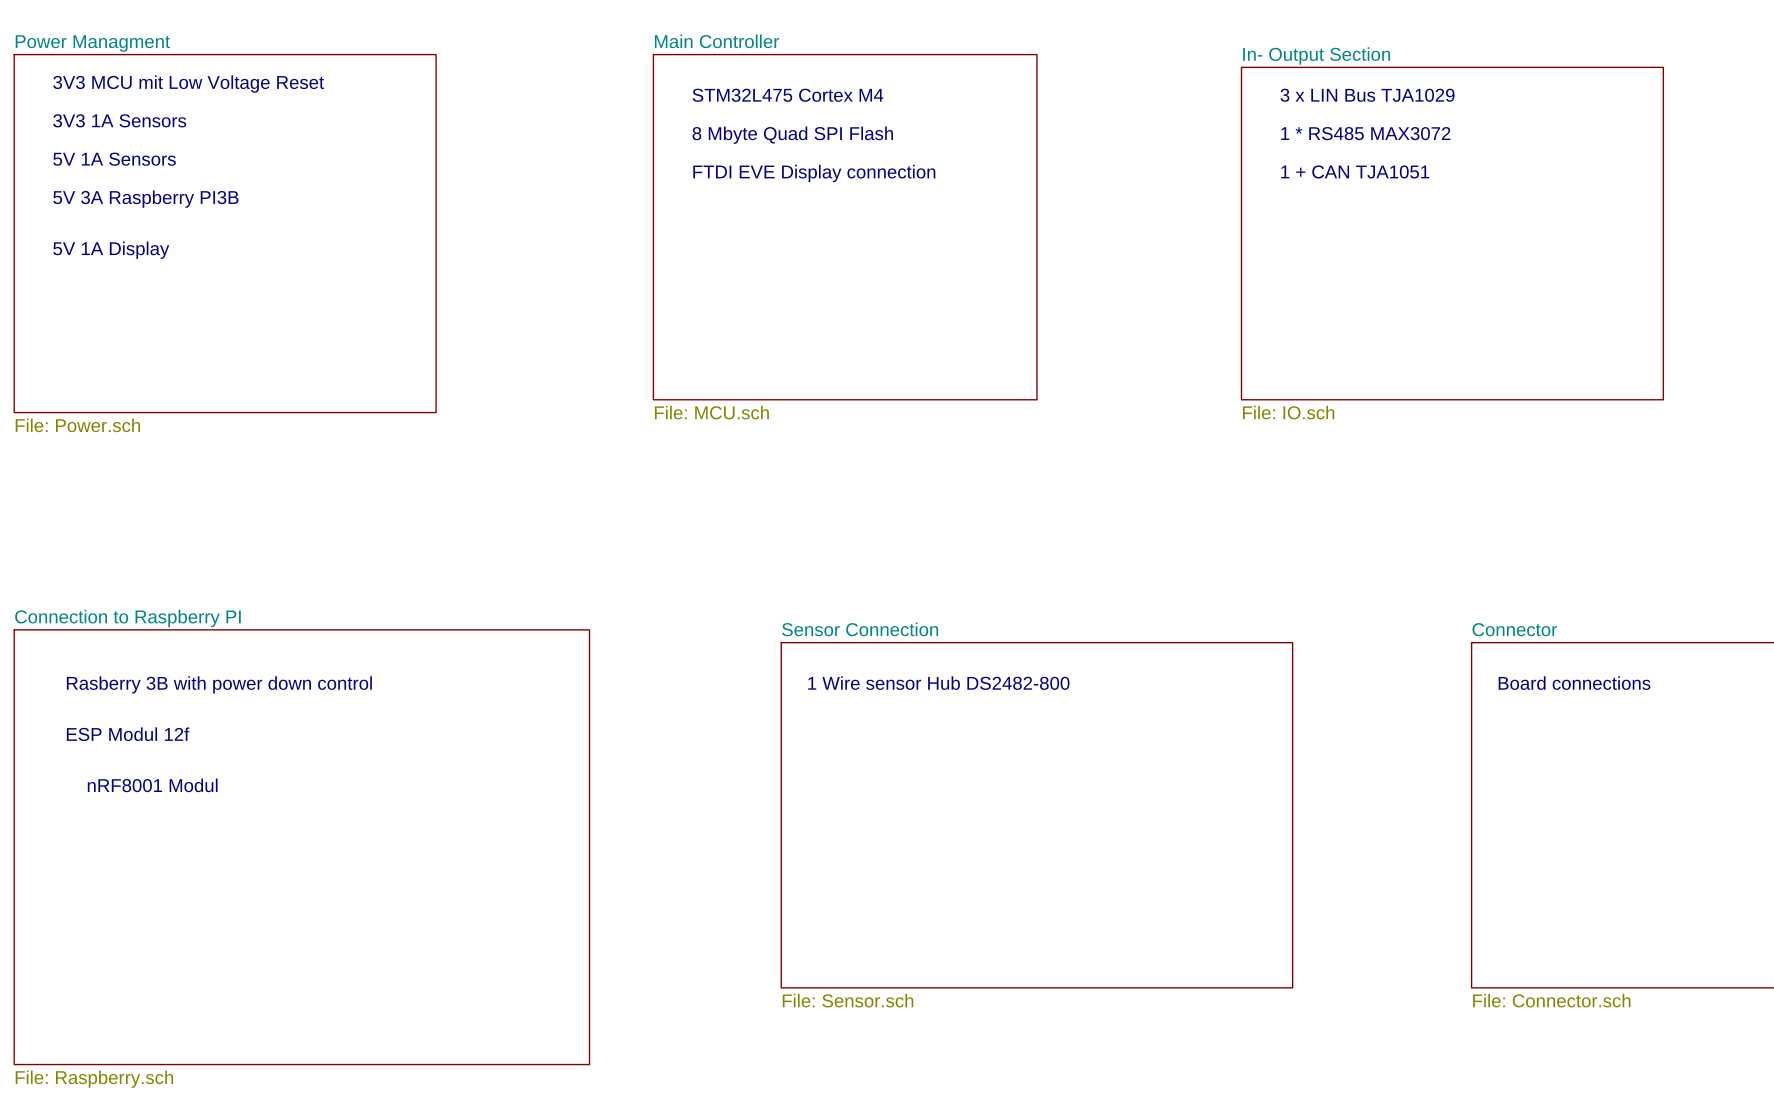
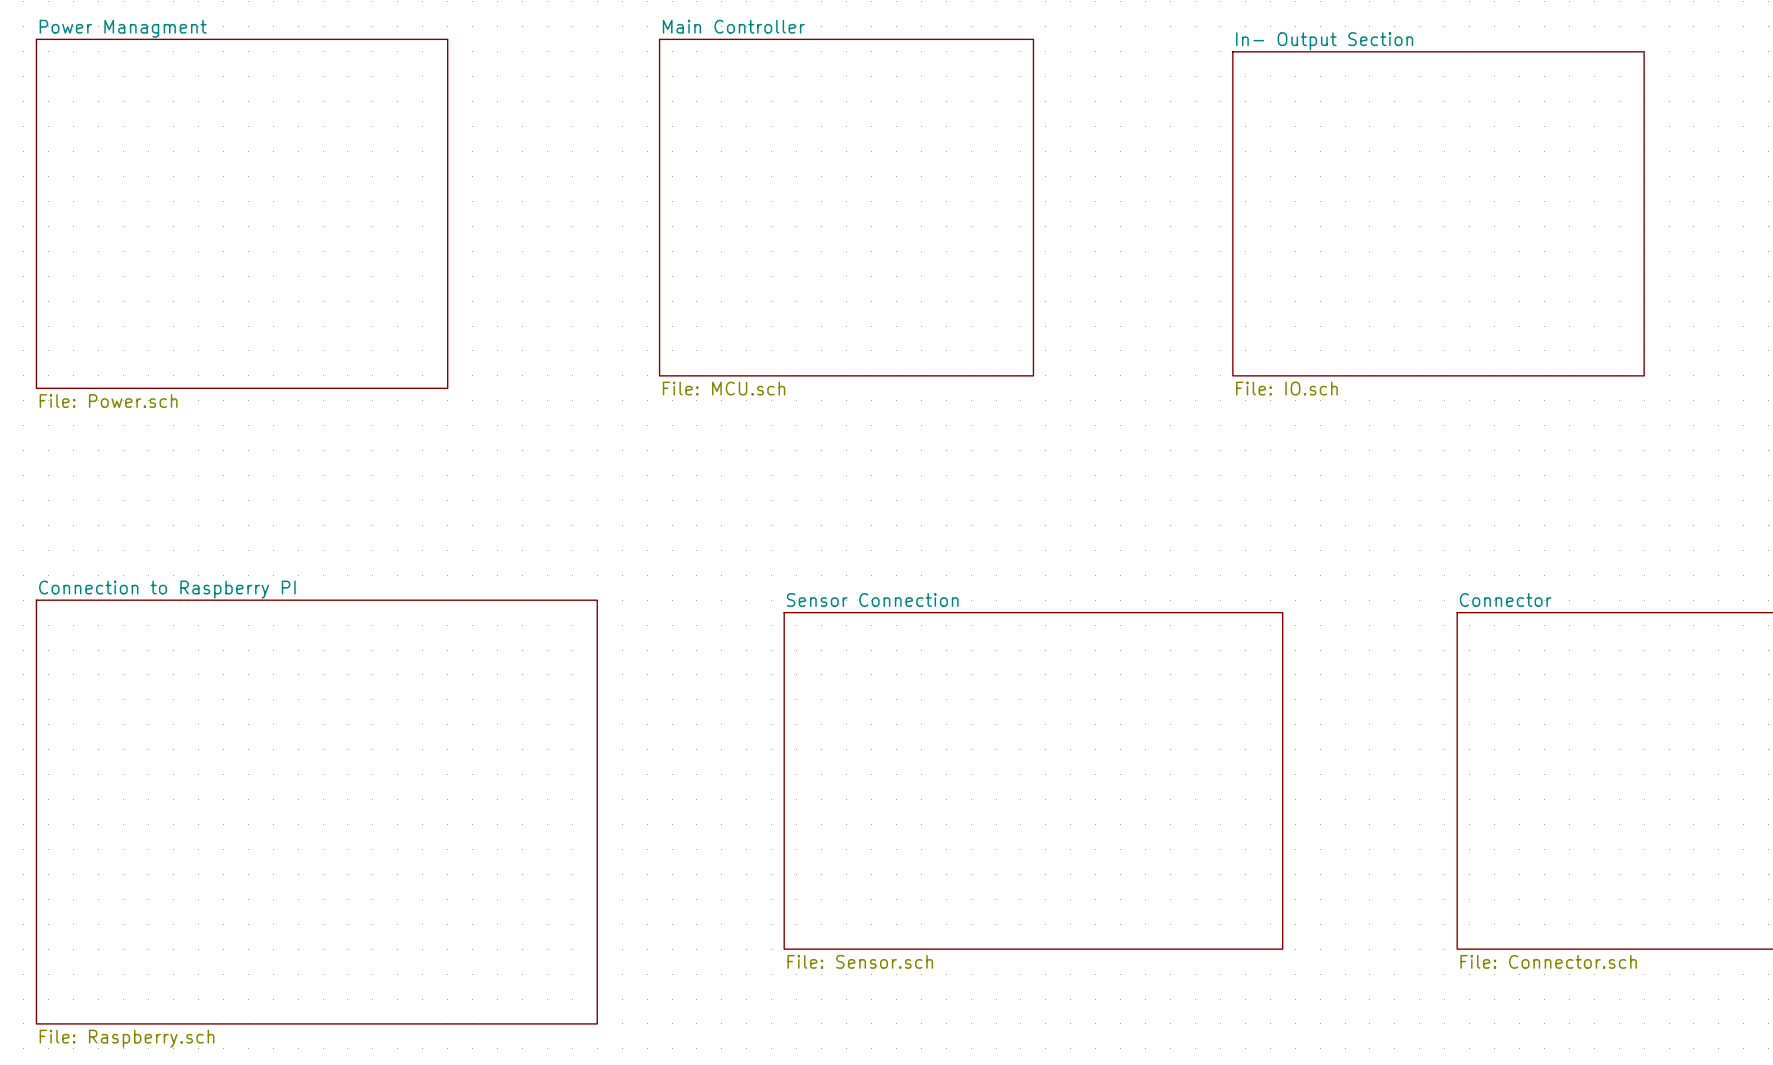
text: 3V3 MCU mit Low Voltage Reset (188, 84) -> none
text: STM32L475 Cortex M4 (787, 95) -> none
text: 3 x LIN Bus TJA1029 (1367, 95) -> none
text: 3V3 1A Sensors (119, 120) -> none
text: 1 * RS485 MAX3072 (1365, 133) -> none
text: 8 Mbyte Quad SPI Flash (792, 135) -> none
text: 5V 1A Sensors (114, 159) -> none
text: 1 + CAN TJA1051 (1355, 171) -> none
text: FTDI EVE Display connection (814, 173) -> none
text: 5V 3A Raspberry PI3B (145, 199) -> none
text: 5V 1A Display (111, 250) -> none
text: 1 Wire sensor Hub DS2482-800 (938, 683) -> none
text: Board connections (1574, 683) -> none
text: Rasberry 3B with power down control (219, 684) -> none
text: ESP Modul 12f (128, 734) -> none
text: nRF8001 Modul (152, 785) -> none

